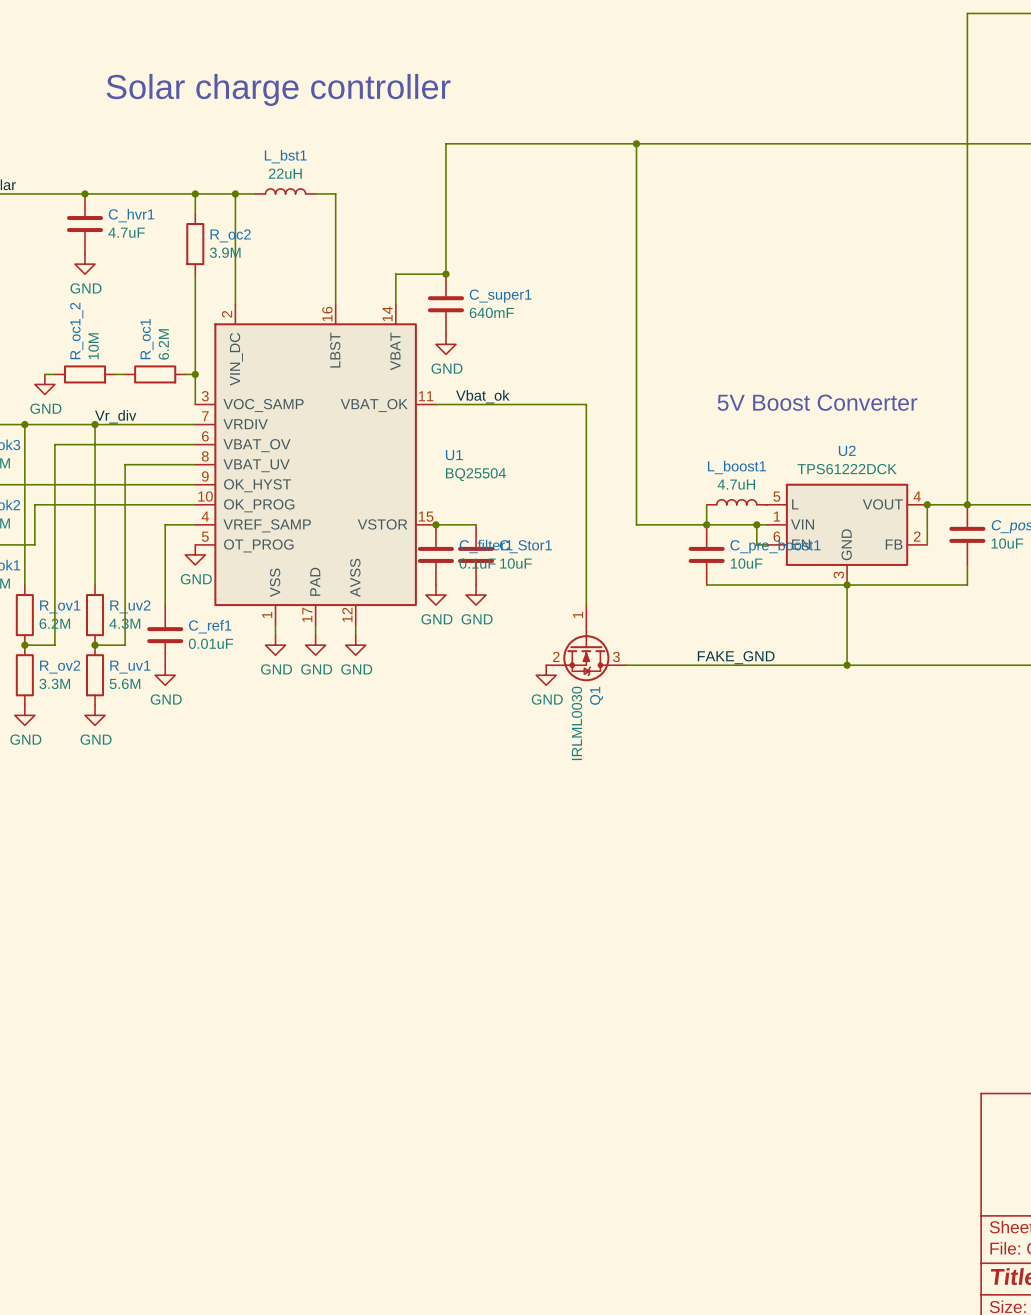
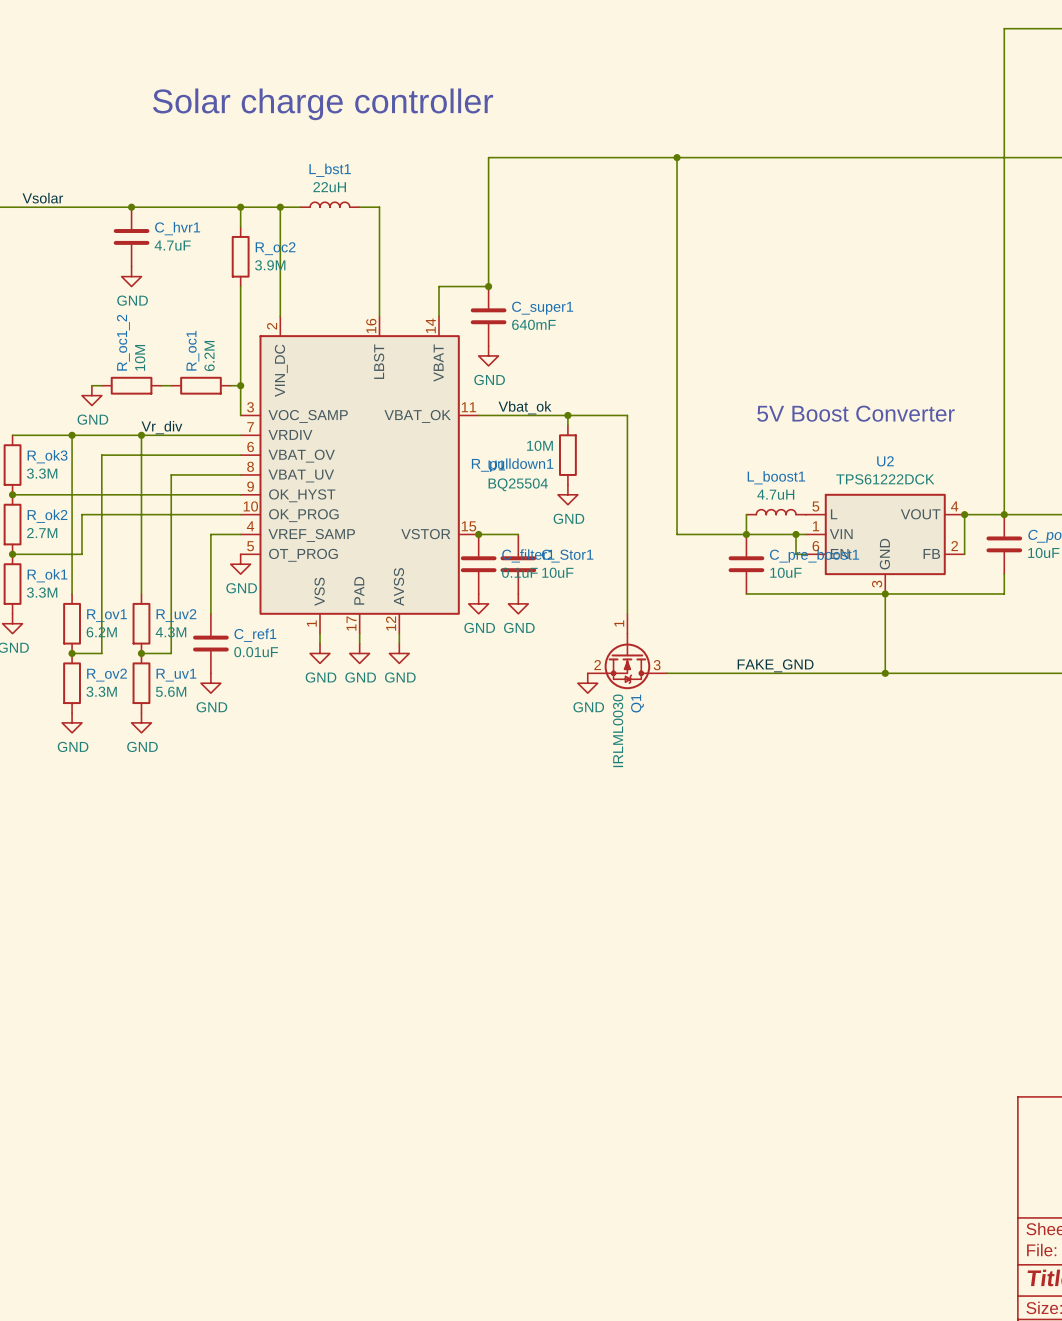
wire: none -> (567, 415) (567, 425)
junction: none -> (567, 415)
R_pulldown1: none -> 10M (567, 455)
power symbol: none -> GND (567, 494)

